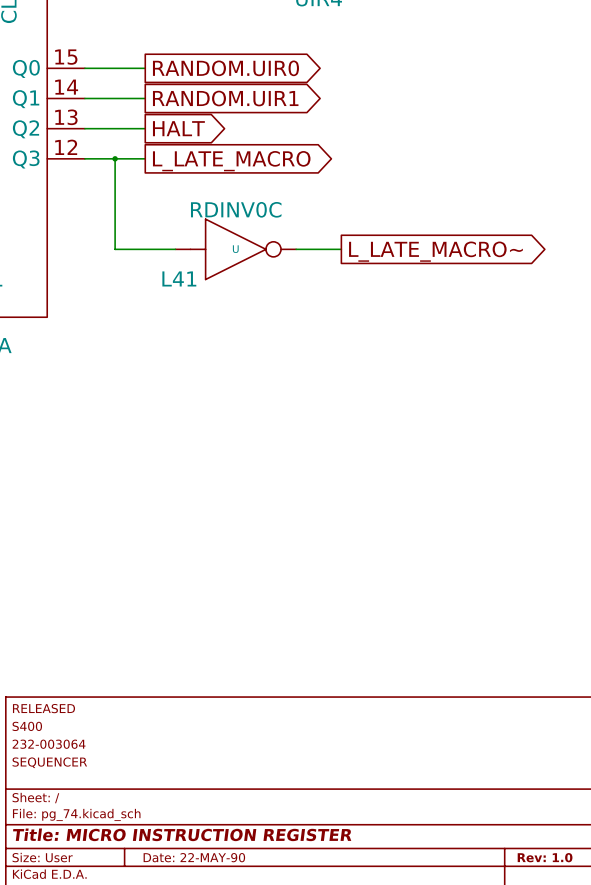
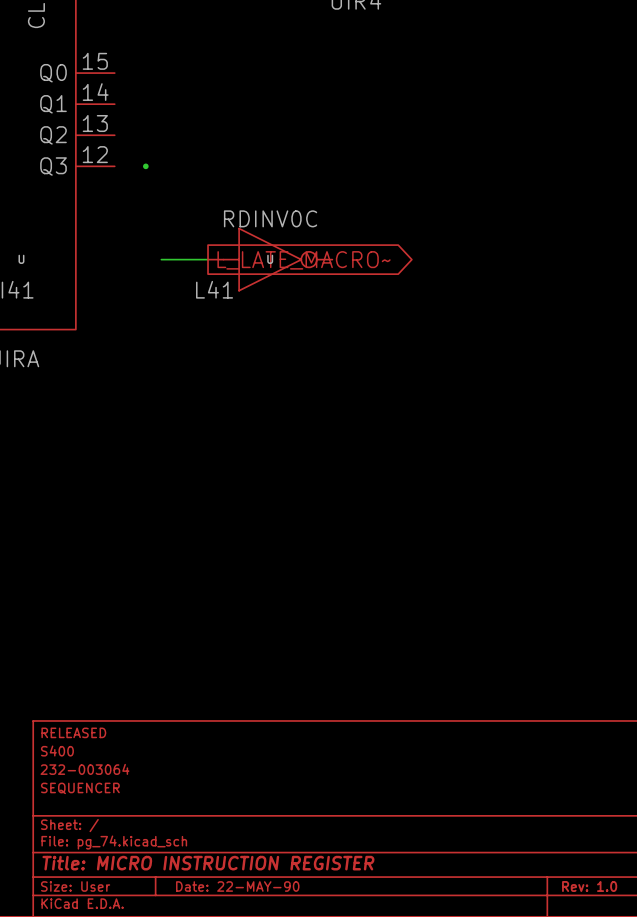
wire: (84, 68) (145, 68) -> none
global label: RANDOM.UIR0 (225, 68) -> none
wire: (84, 98) (145, 98) -> none
global label: RANDOM.UIR1 (225, 98) -> none
wire: (84, 128) (145, 128) -> none
global label: HALT (178, 128) -> none
wire: (84, 158) (145, 158) -> none
wire: (115, 158) (115, 249) (130, 249) -> none
global label: L_LATE_MACRO (231, 161) -> none
wire: (296, 249) (341, 249) -> none
global label: none -> L_LATE_MACRO~ (304, 260)
global label: L_LATE_MACRO~ (435, 251) -> none

